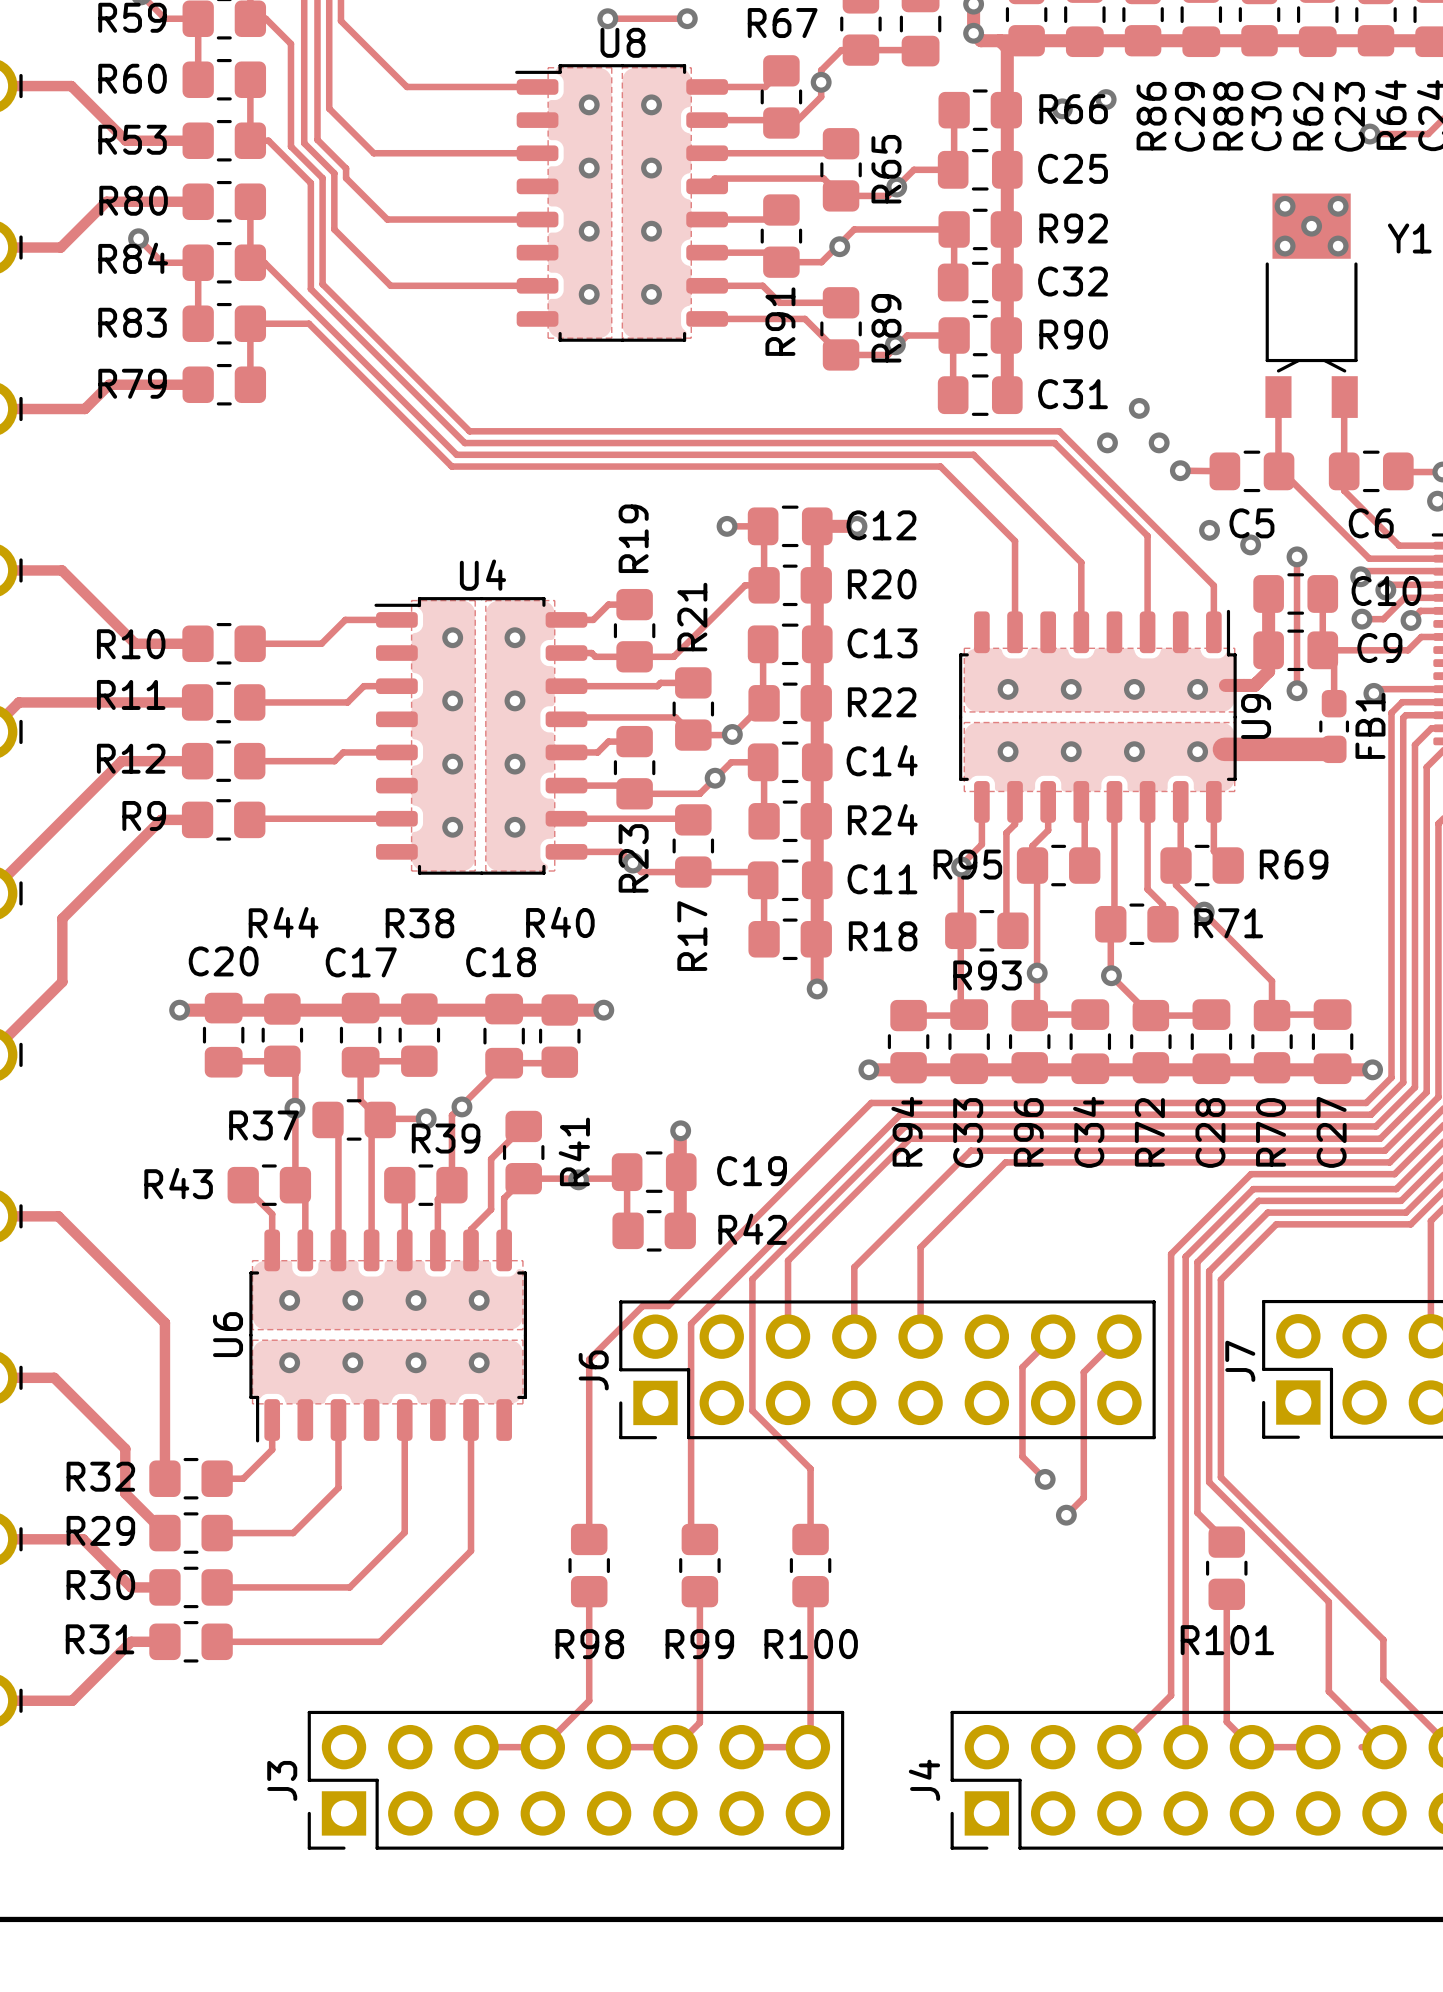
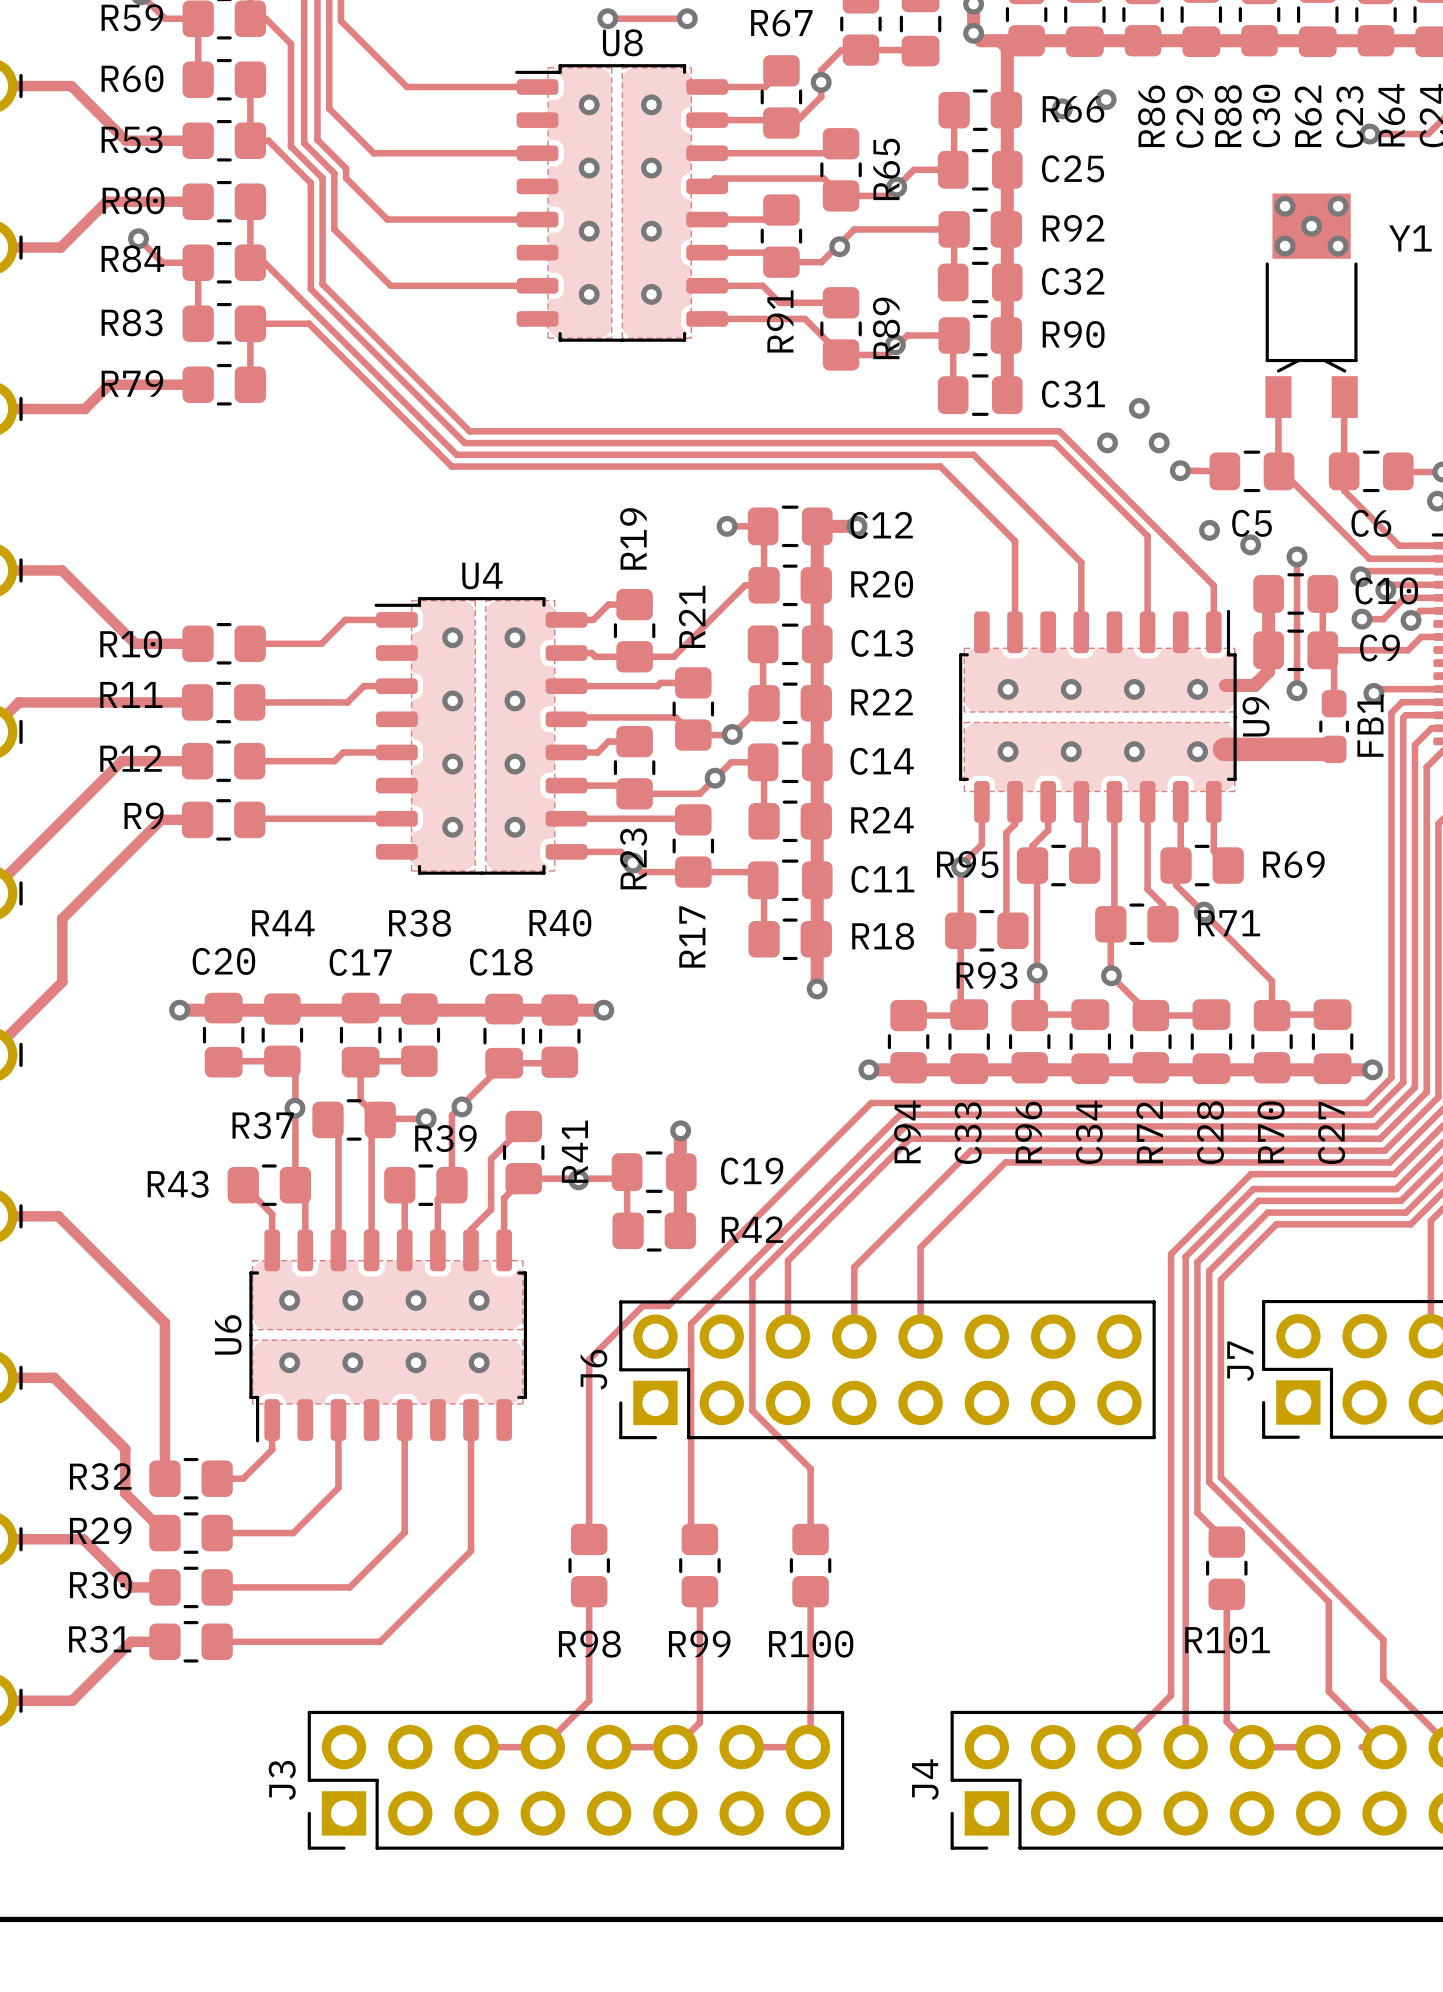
track: (1053, 1336) (1022, 1367) (1022, 1456) (1045, 1479) -> none
track: (1119, 1336) (1083, 1372) (1083, 1497) (1066, 1515) -> none
via: (1045, 1479) -> none
via: (1066, 1515) -> none

